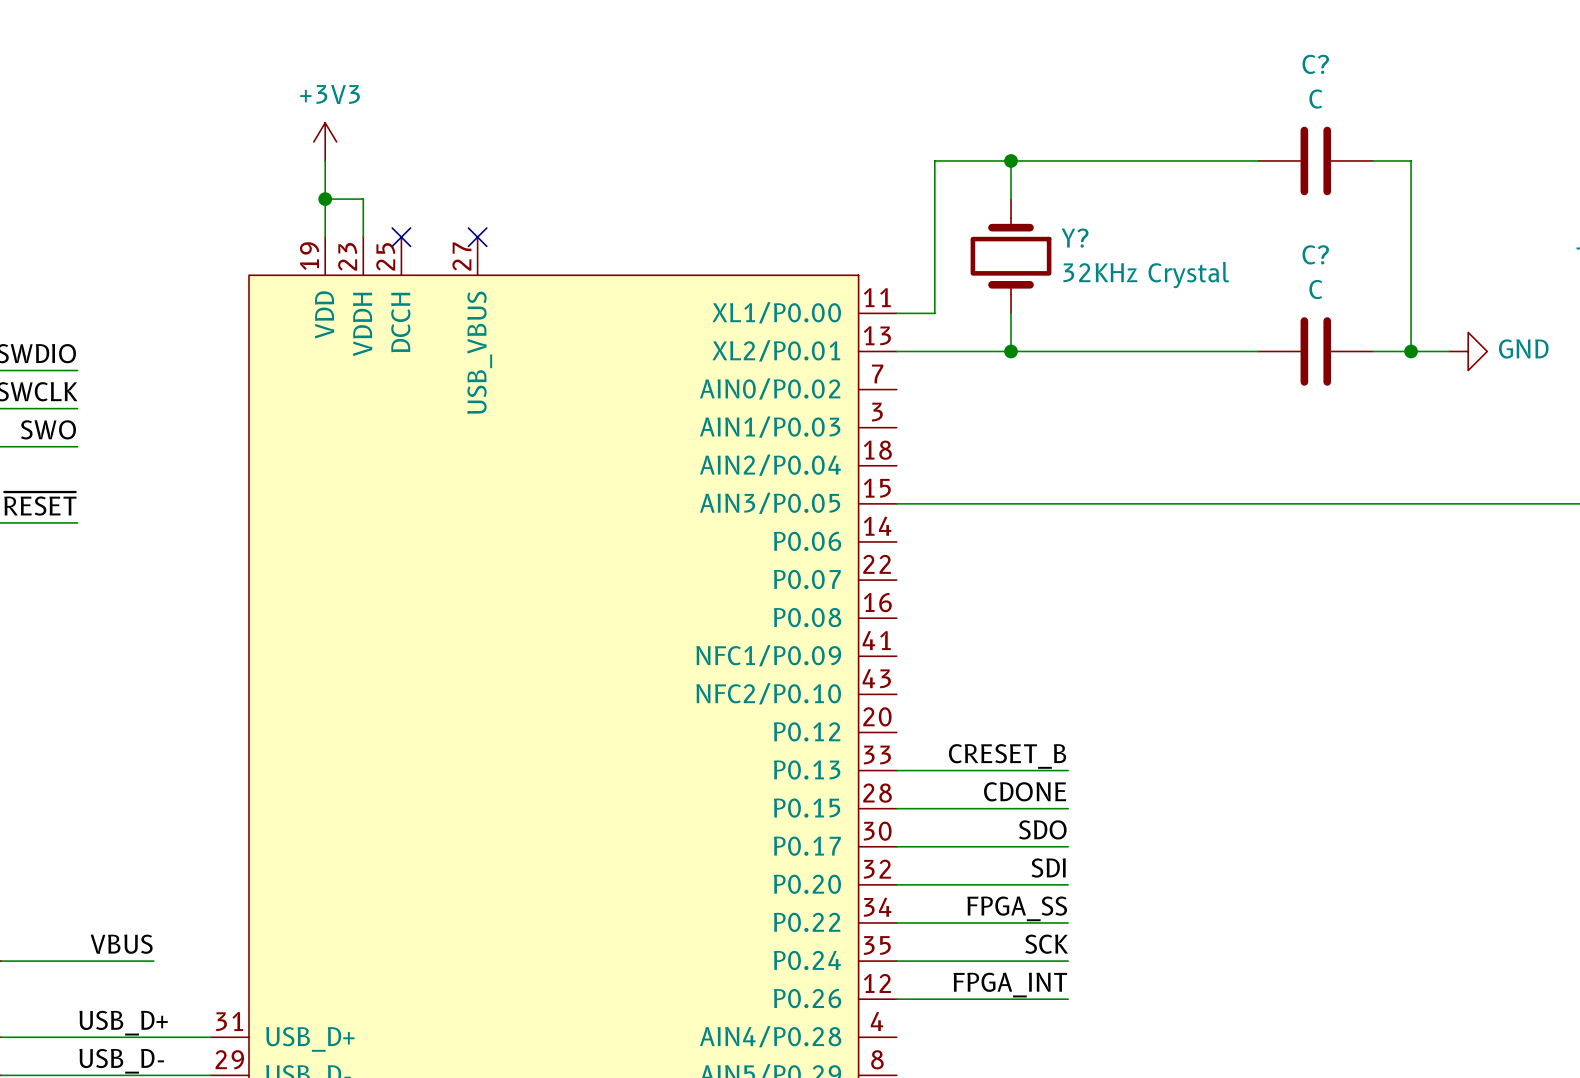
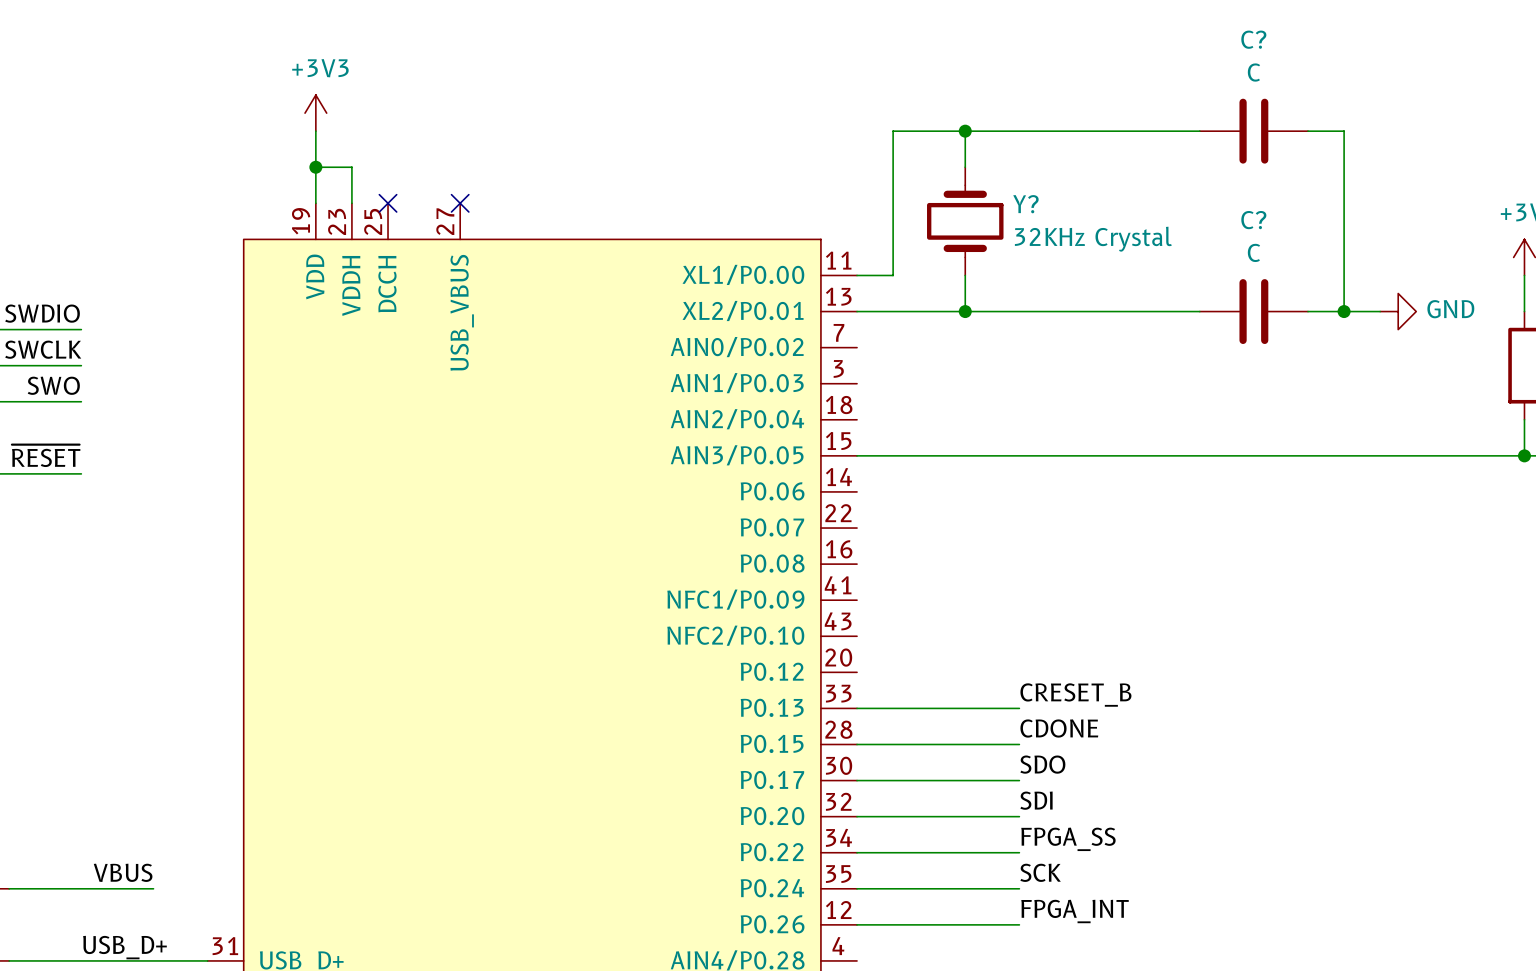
label position: CRESET_B (1007, 756) -> CRESET_B (1075, 695)
label position: CDONE (1025, 791) -> CDONE (1059, 728)
label position: SDO (1042, 829) -> SDO (1042, 764)
label position: SDI (1048, 867) -> SDI (1036, 800)
label position: FPGA_SS (1017, 908) -> FPGA_SS (1068, 839)
label position: SCK (1046, 944) -> SCK (1040, 872)
label position: FPGA_INT (1010, 985) -> FPGA_INT (1075, 911)

